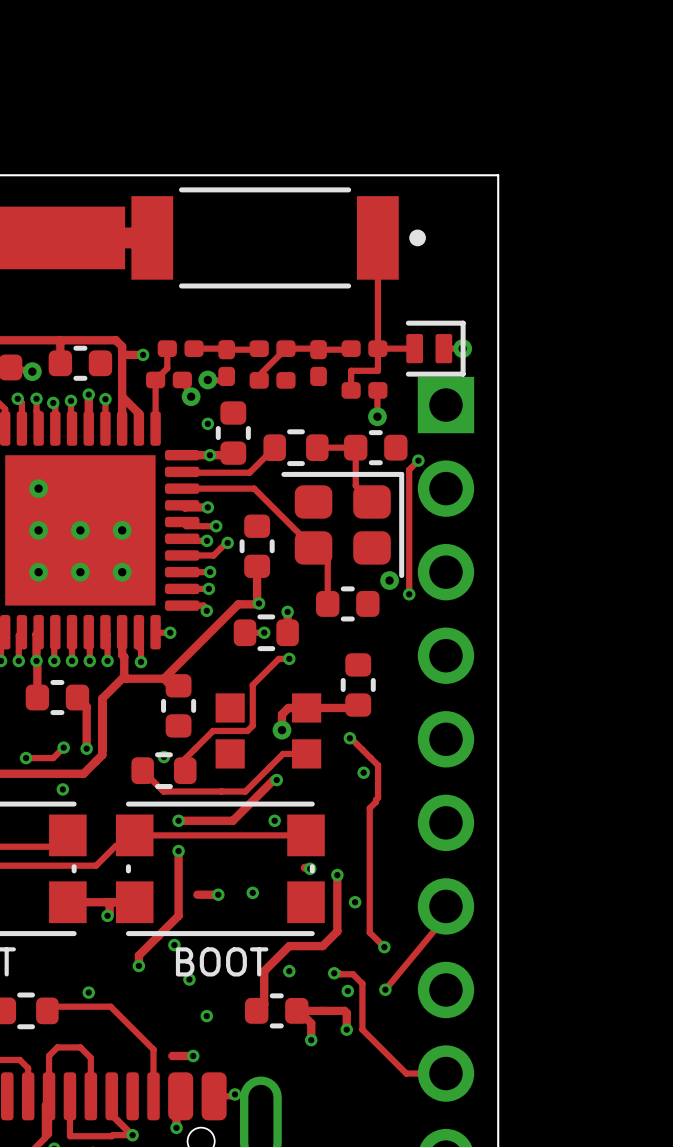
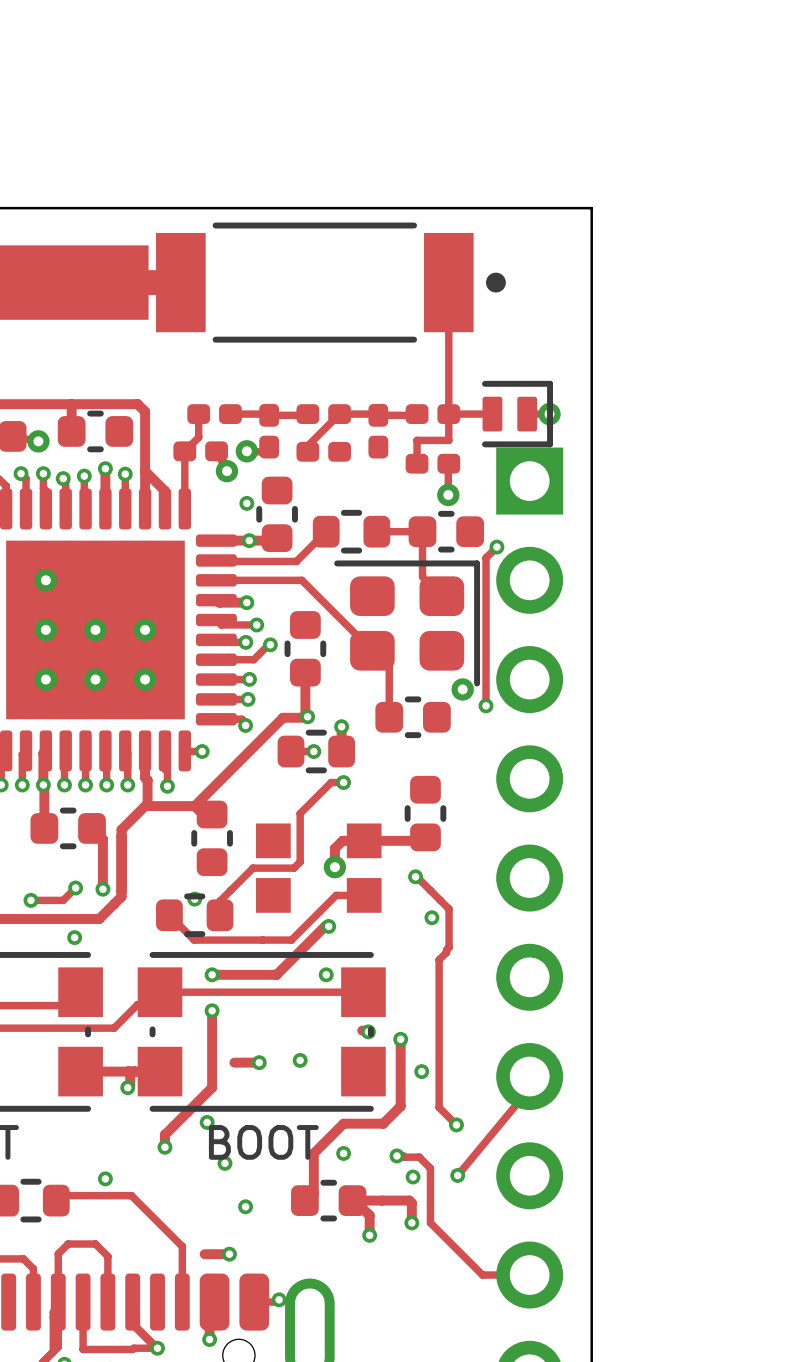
track: (122, 354) (143, 354) -> none
via: (143, 354) -> none

